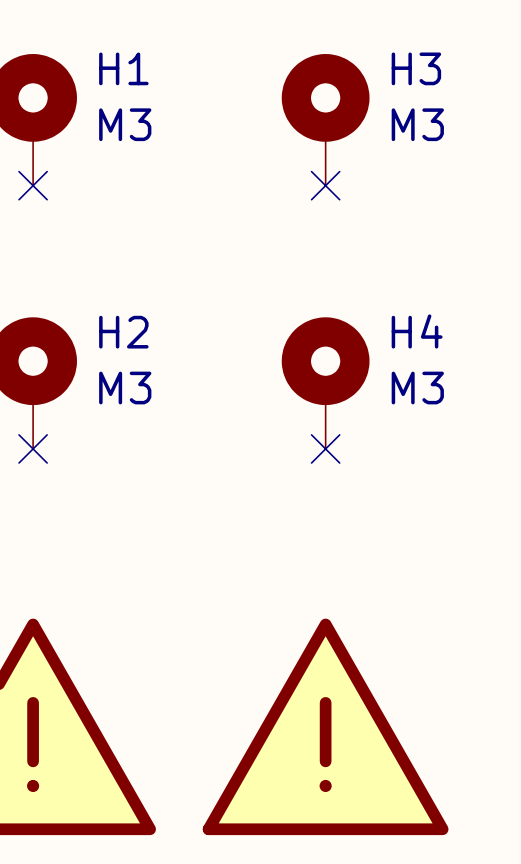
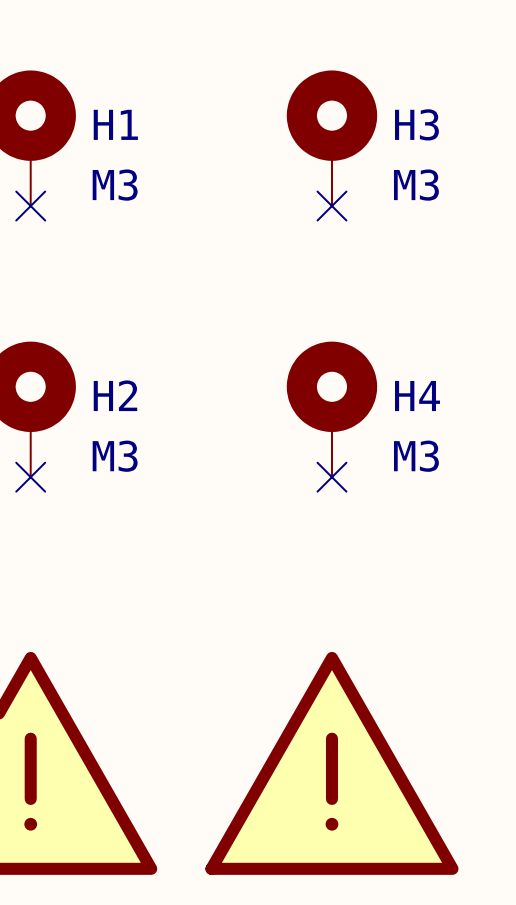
H1 name position: H1 (123, 68) -> H1 (115, 124)
H3 name position: H3 (416, 68) -> H3 (416, 124)
H1 value position: M3 (125, 124) -> M3 (115, 185)
H3 value position: M3 (417, 124) -> M3 (416, 185)
H4 name position: H4 (417, 331) -> H4 (417, 396)
H2 name position: H2 (123, 332) -> H2 (115, 395)
H2 value position: M3 (125, 388) -> M3 (115, 456)
H4 value position: M3 (417, 388) -> M3 (416, 456)

